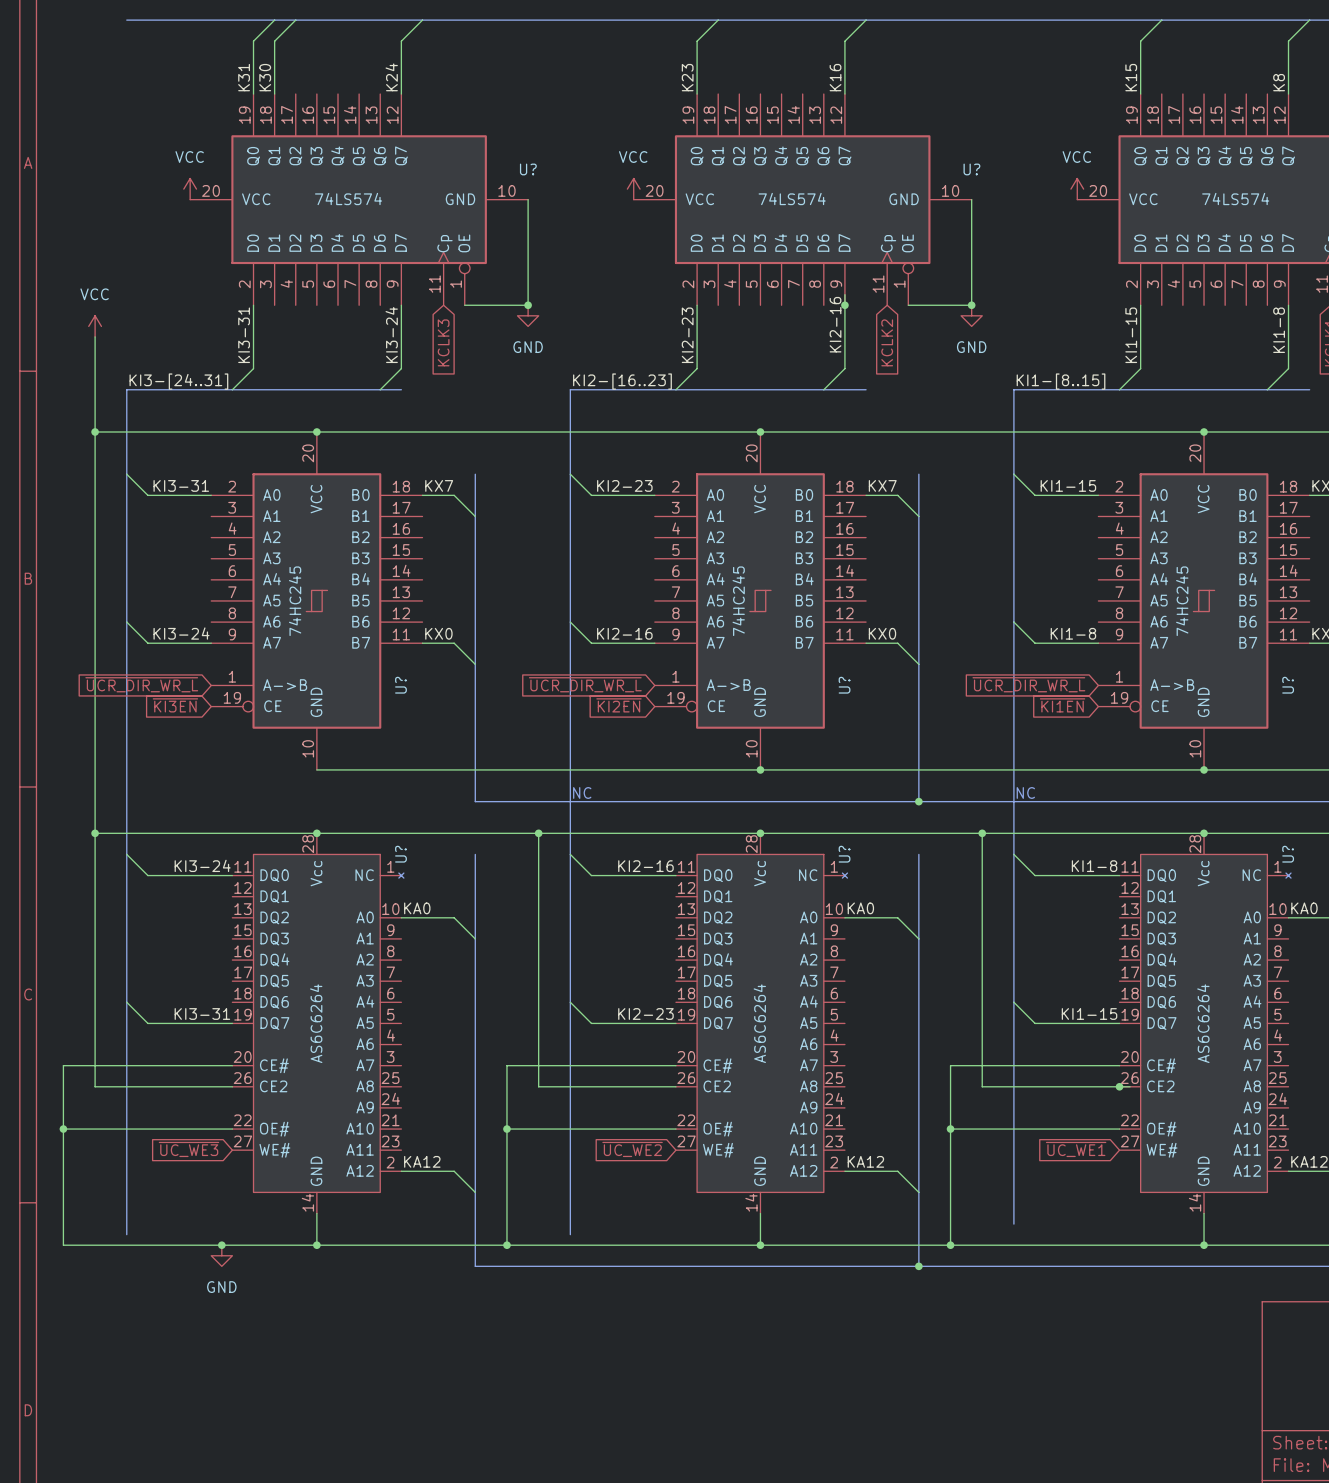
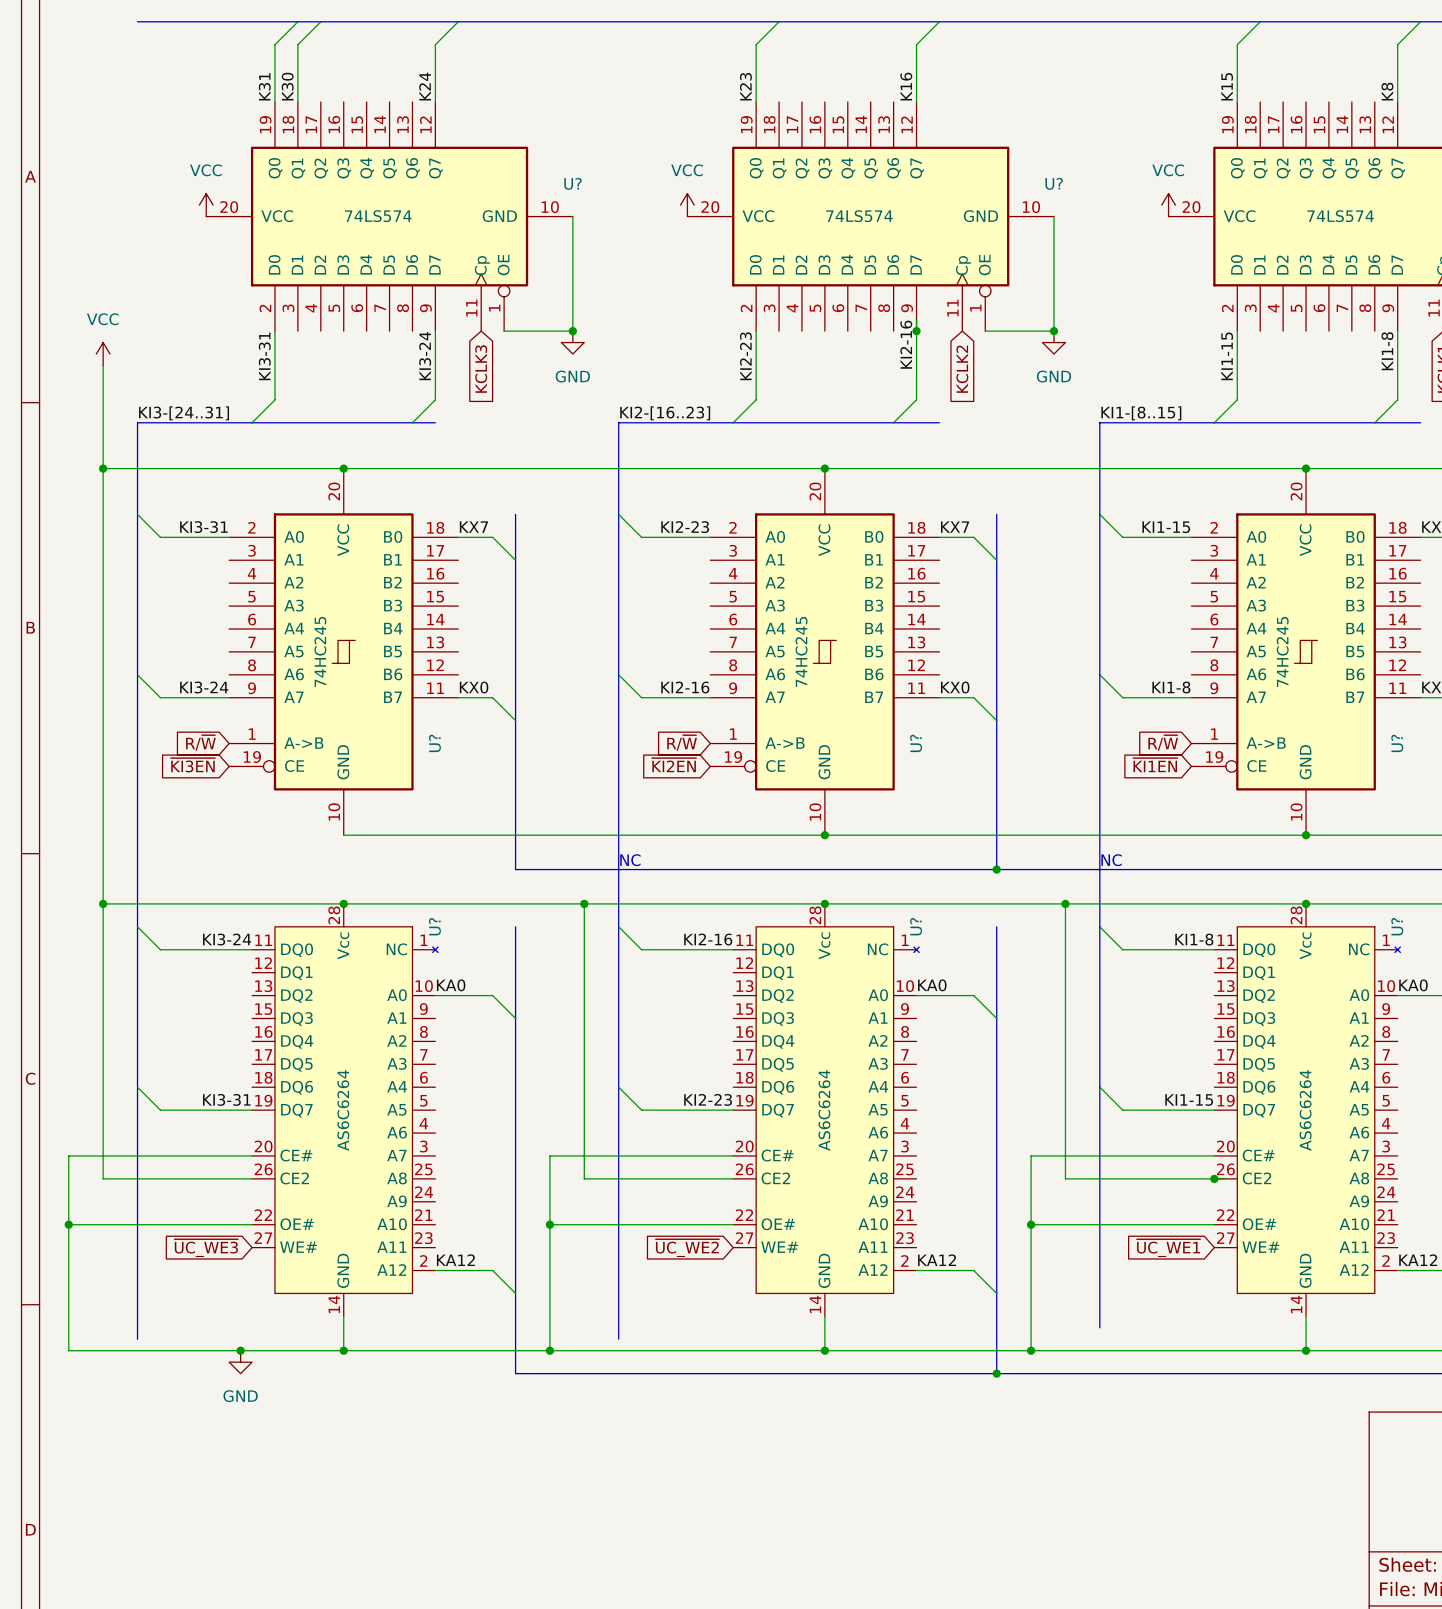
global label: ~{UCR_DIR_WR_L} (141, 684) -> R/~{W} (200, 742)
global label: ~{UCR_DIR_WR_L} (585, 684) -> R/~{W} (682, 742)
global label: ~{UCR_DIR_WR_L} (1028, 684) -> R/~{W} (1163, 742)

